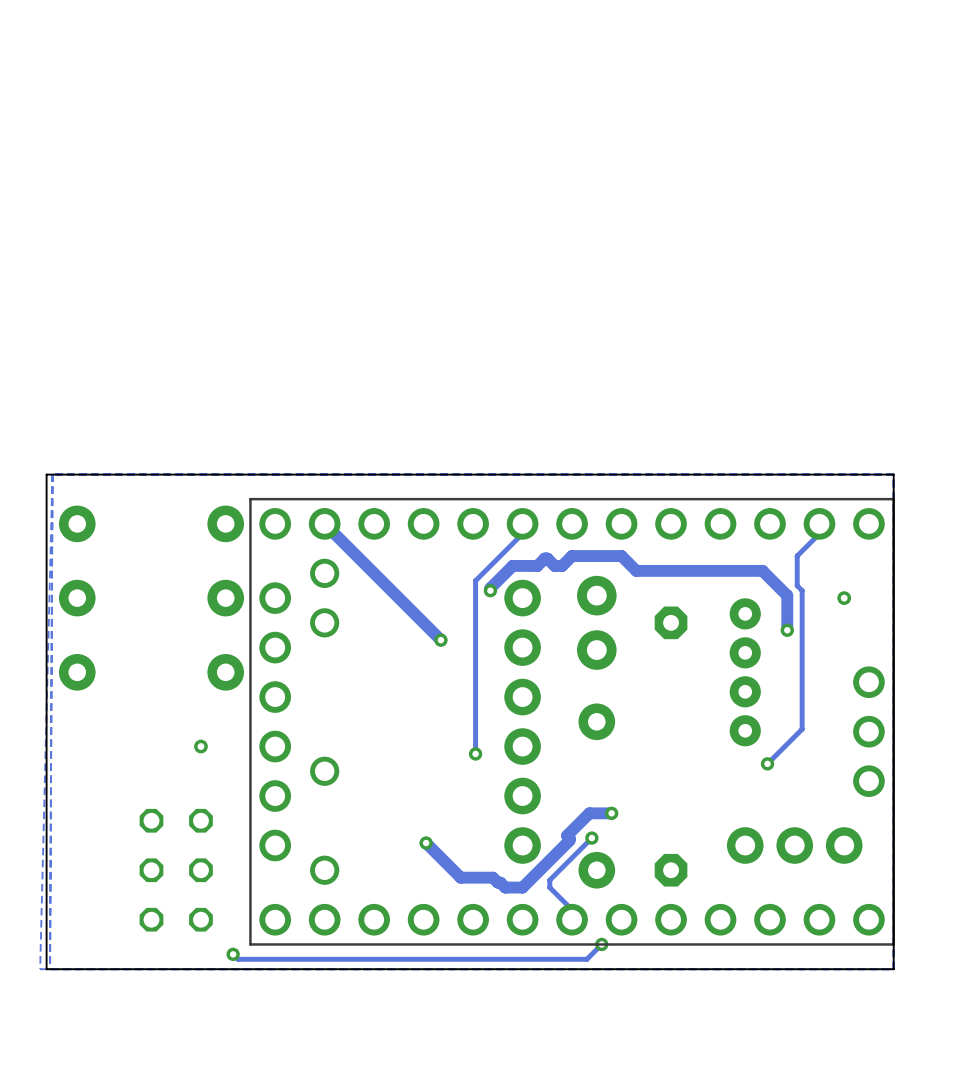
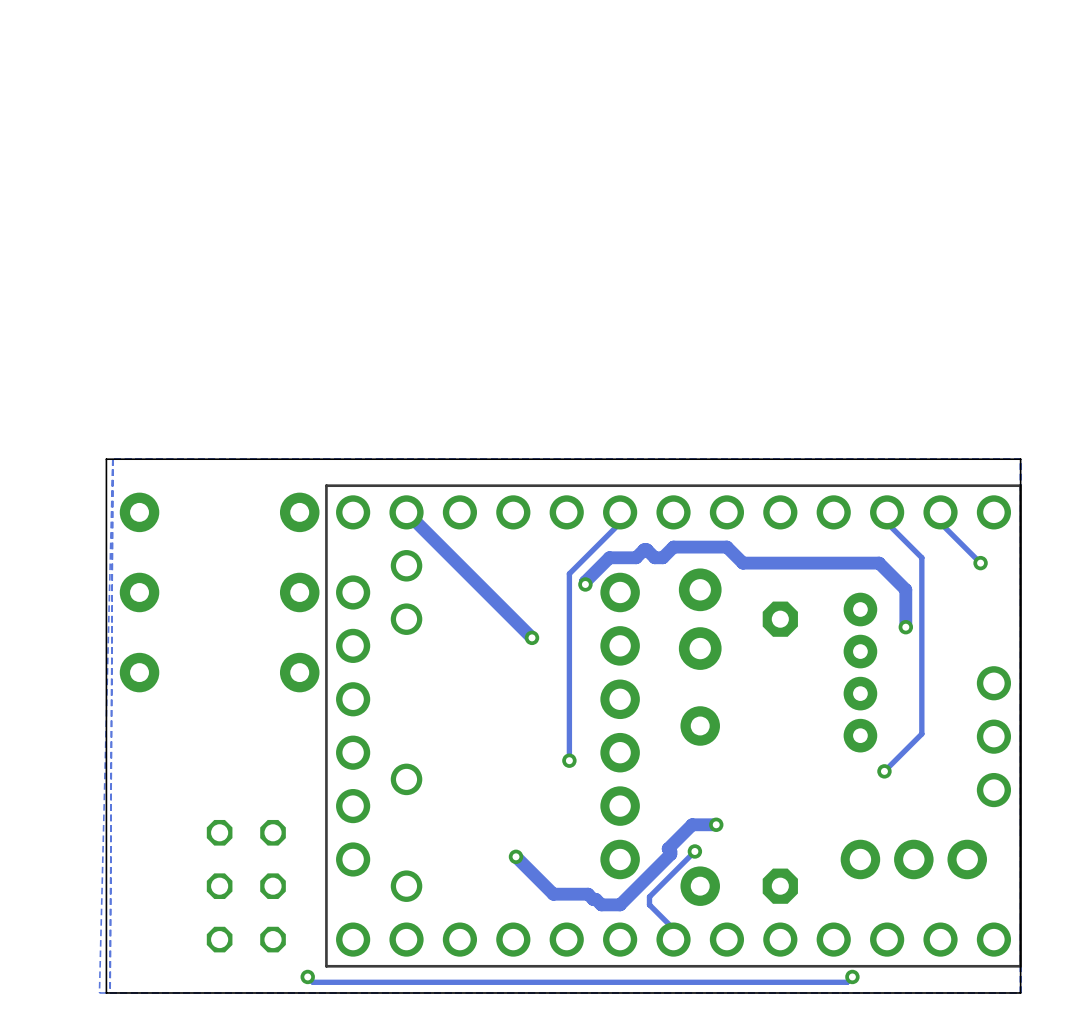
track: (819, 533) (797, 556) (797, 585) (802, 590) -> (887, 512) (887, 523) (921, 557) (921, 584)
track: none -> (940, 523) (980, 563)
via: none -> (980, 563)
via: (844, 598) -> none
via: (200, 746) -> none
track: (601, 944) (586, 959) -> (852, 976) (847, 982) (689, 982)
via: (601, 944) -> none
via: none -> (852, 976)

